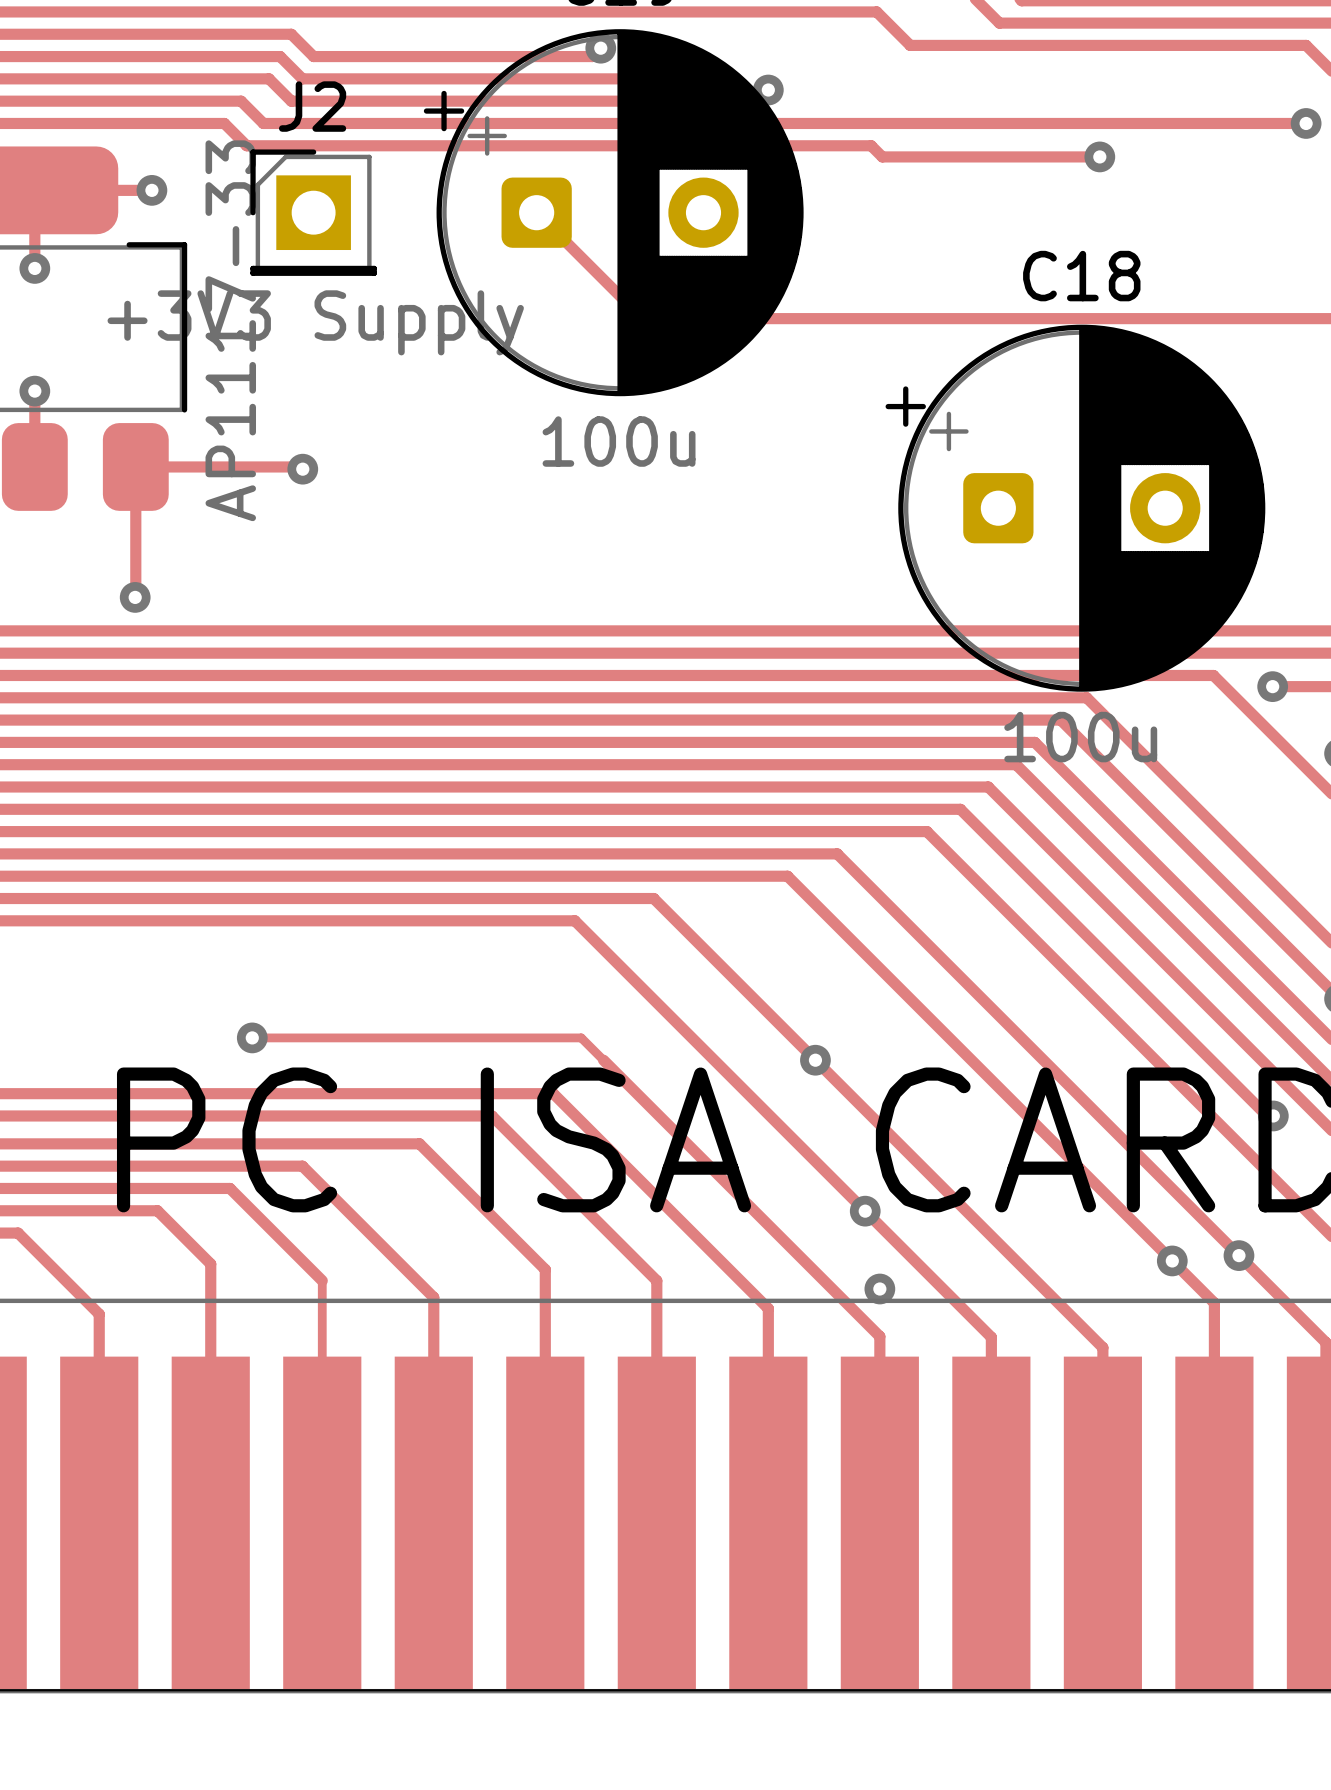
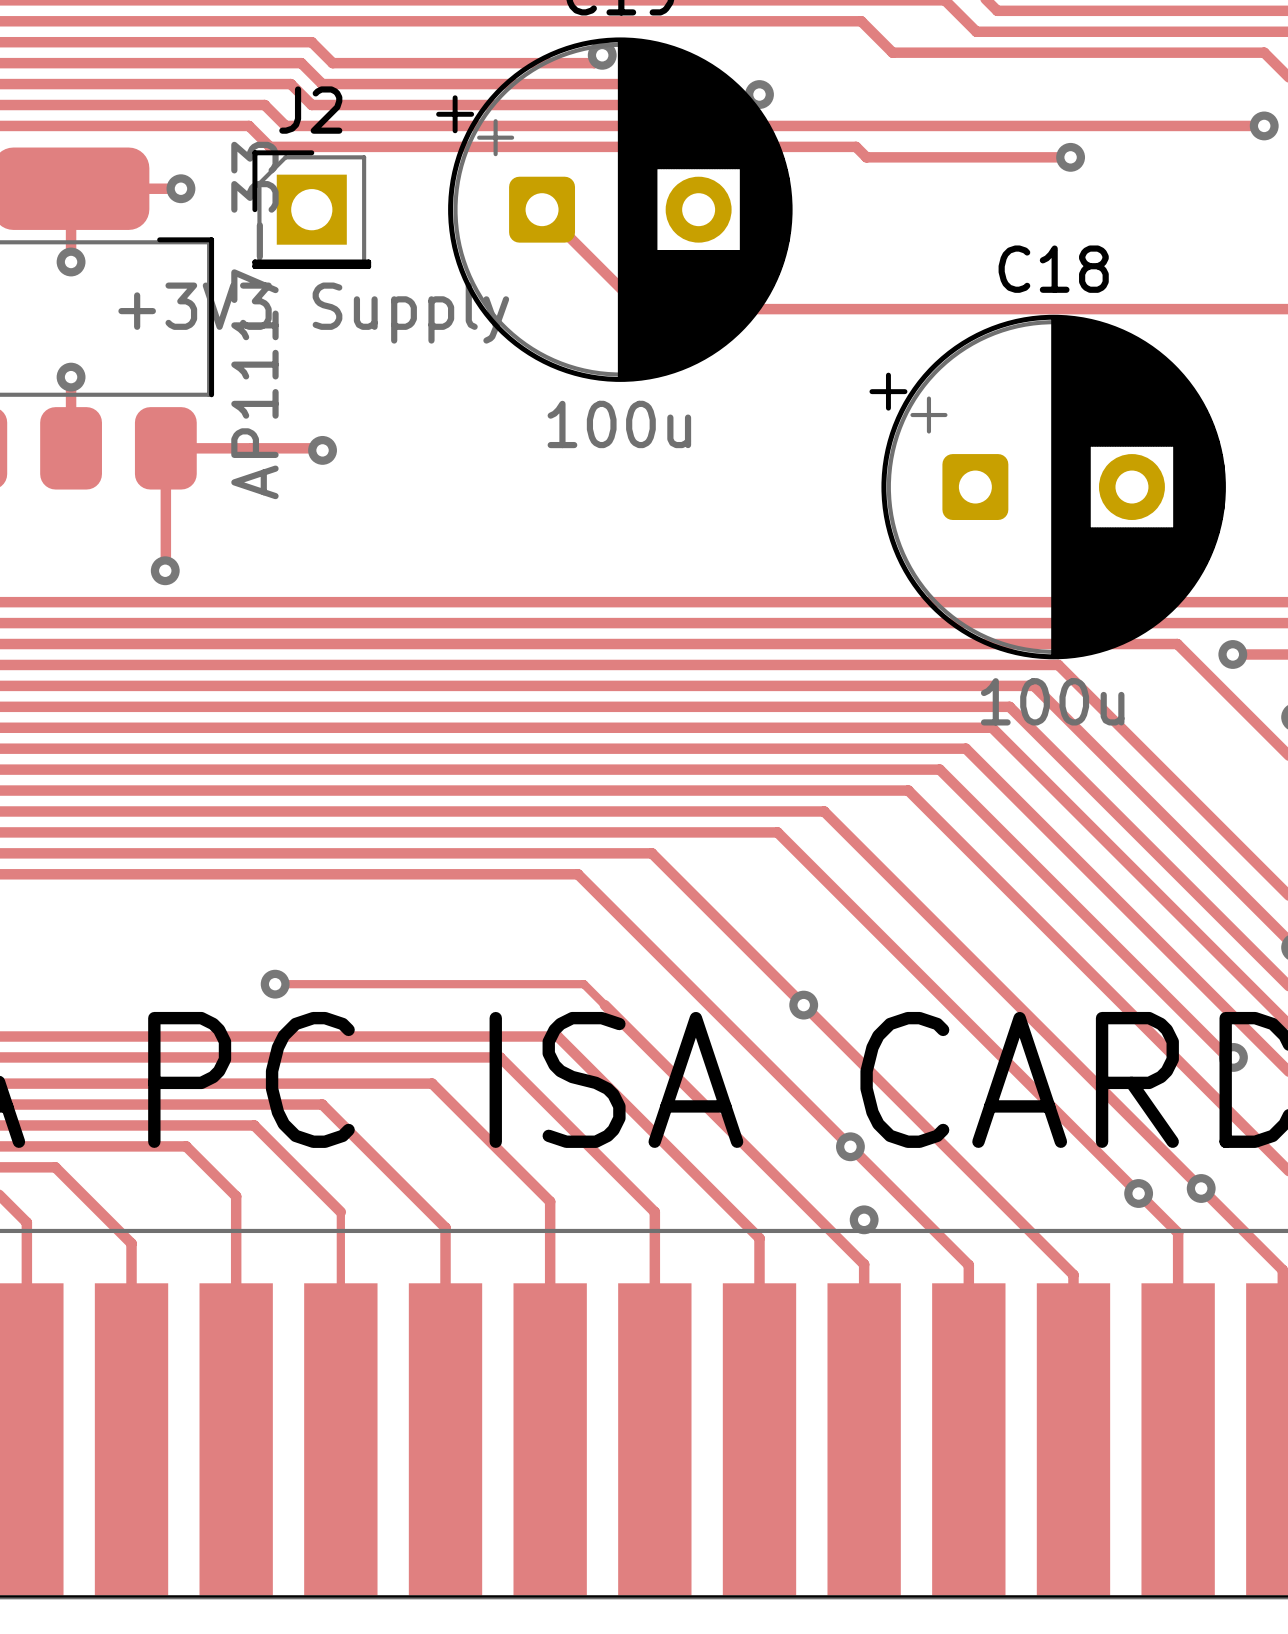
J2 position: (313, 212) -> (311, 209)

